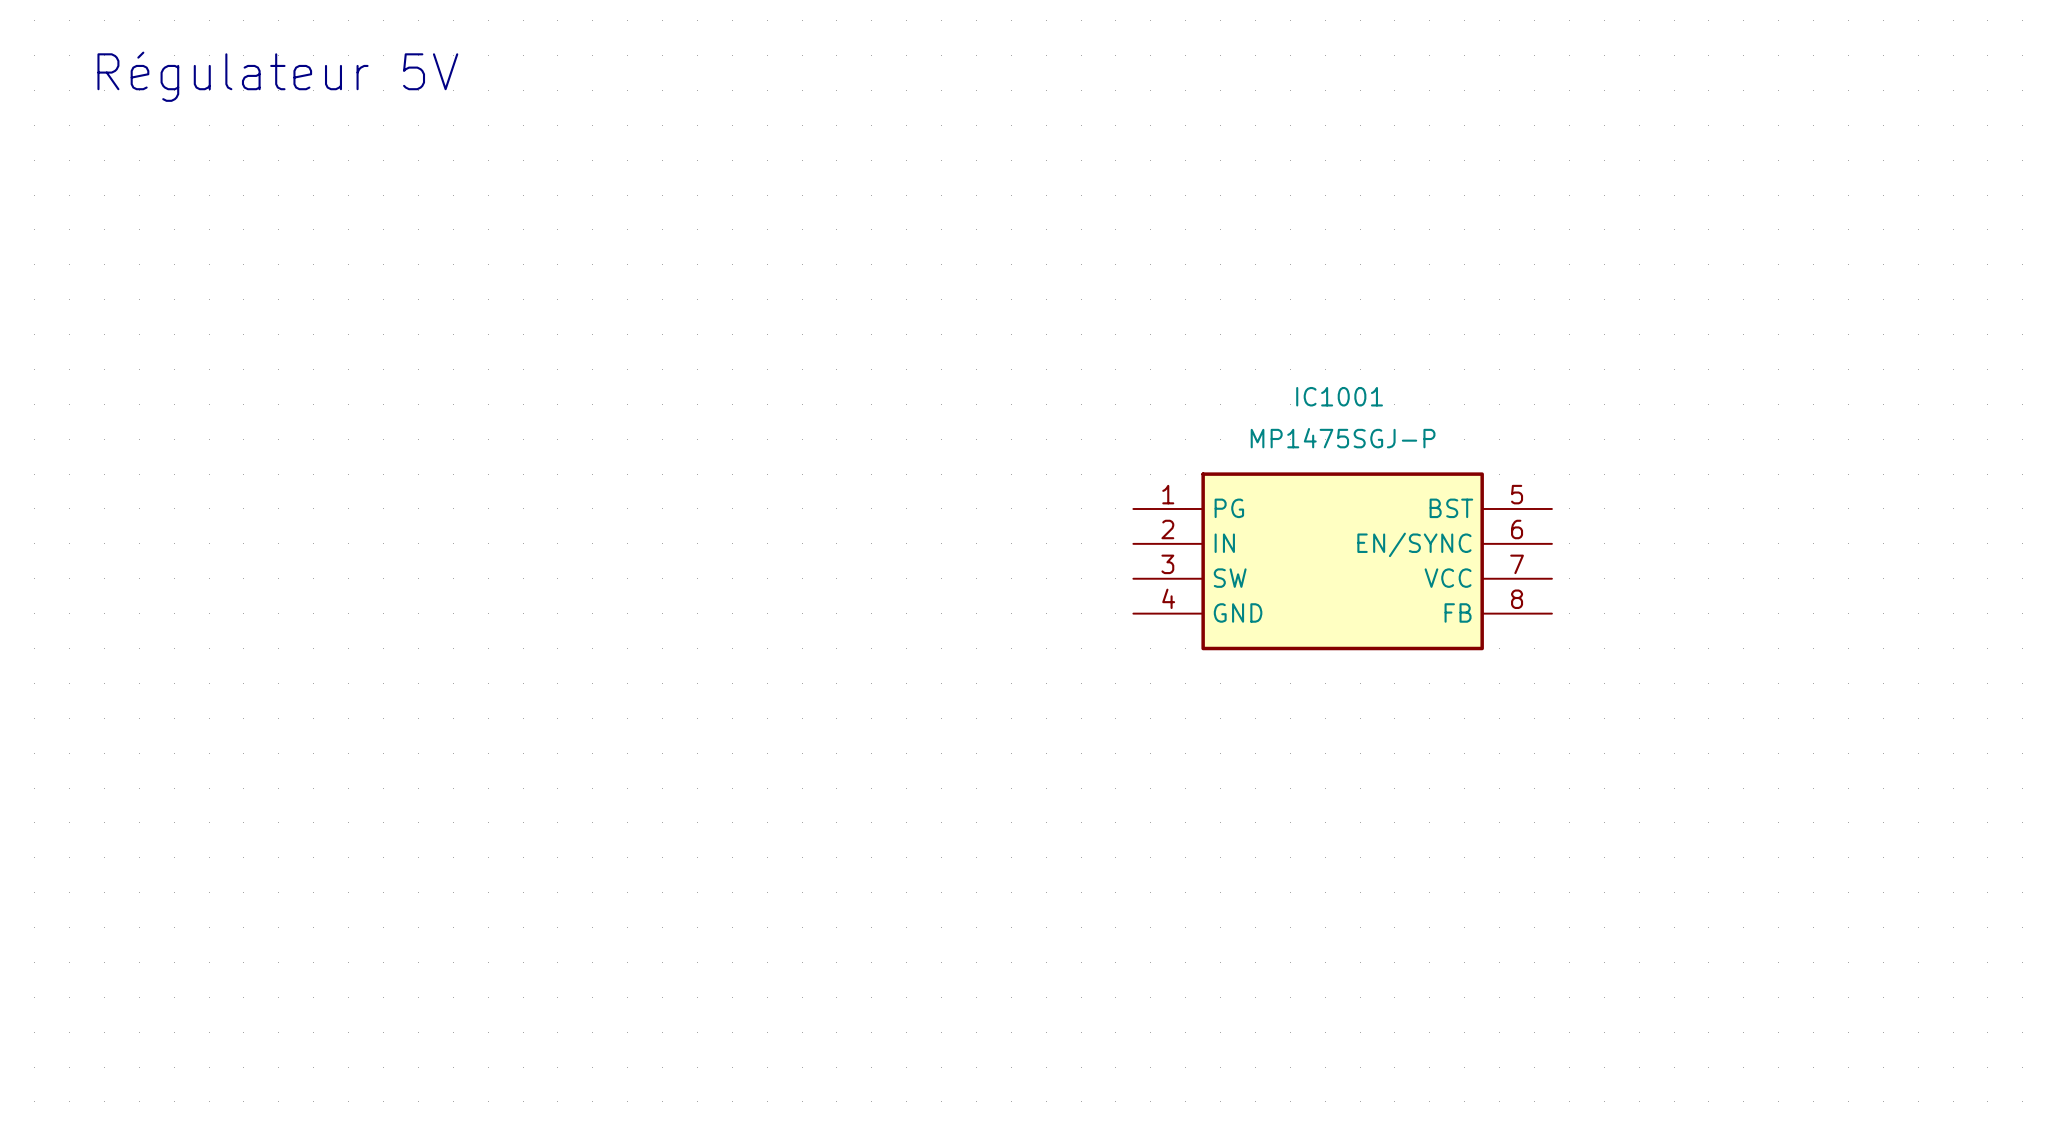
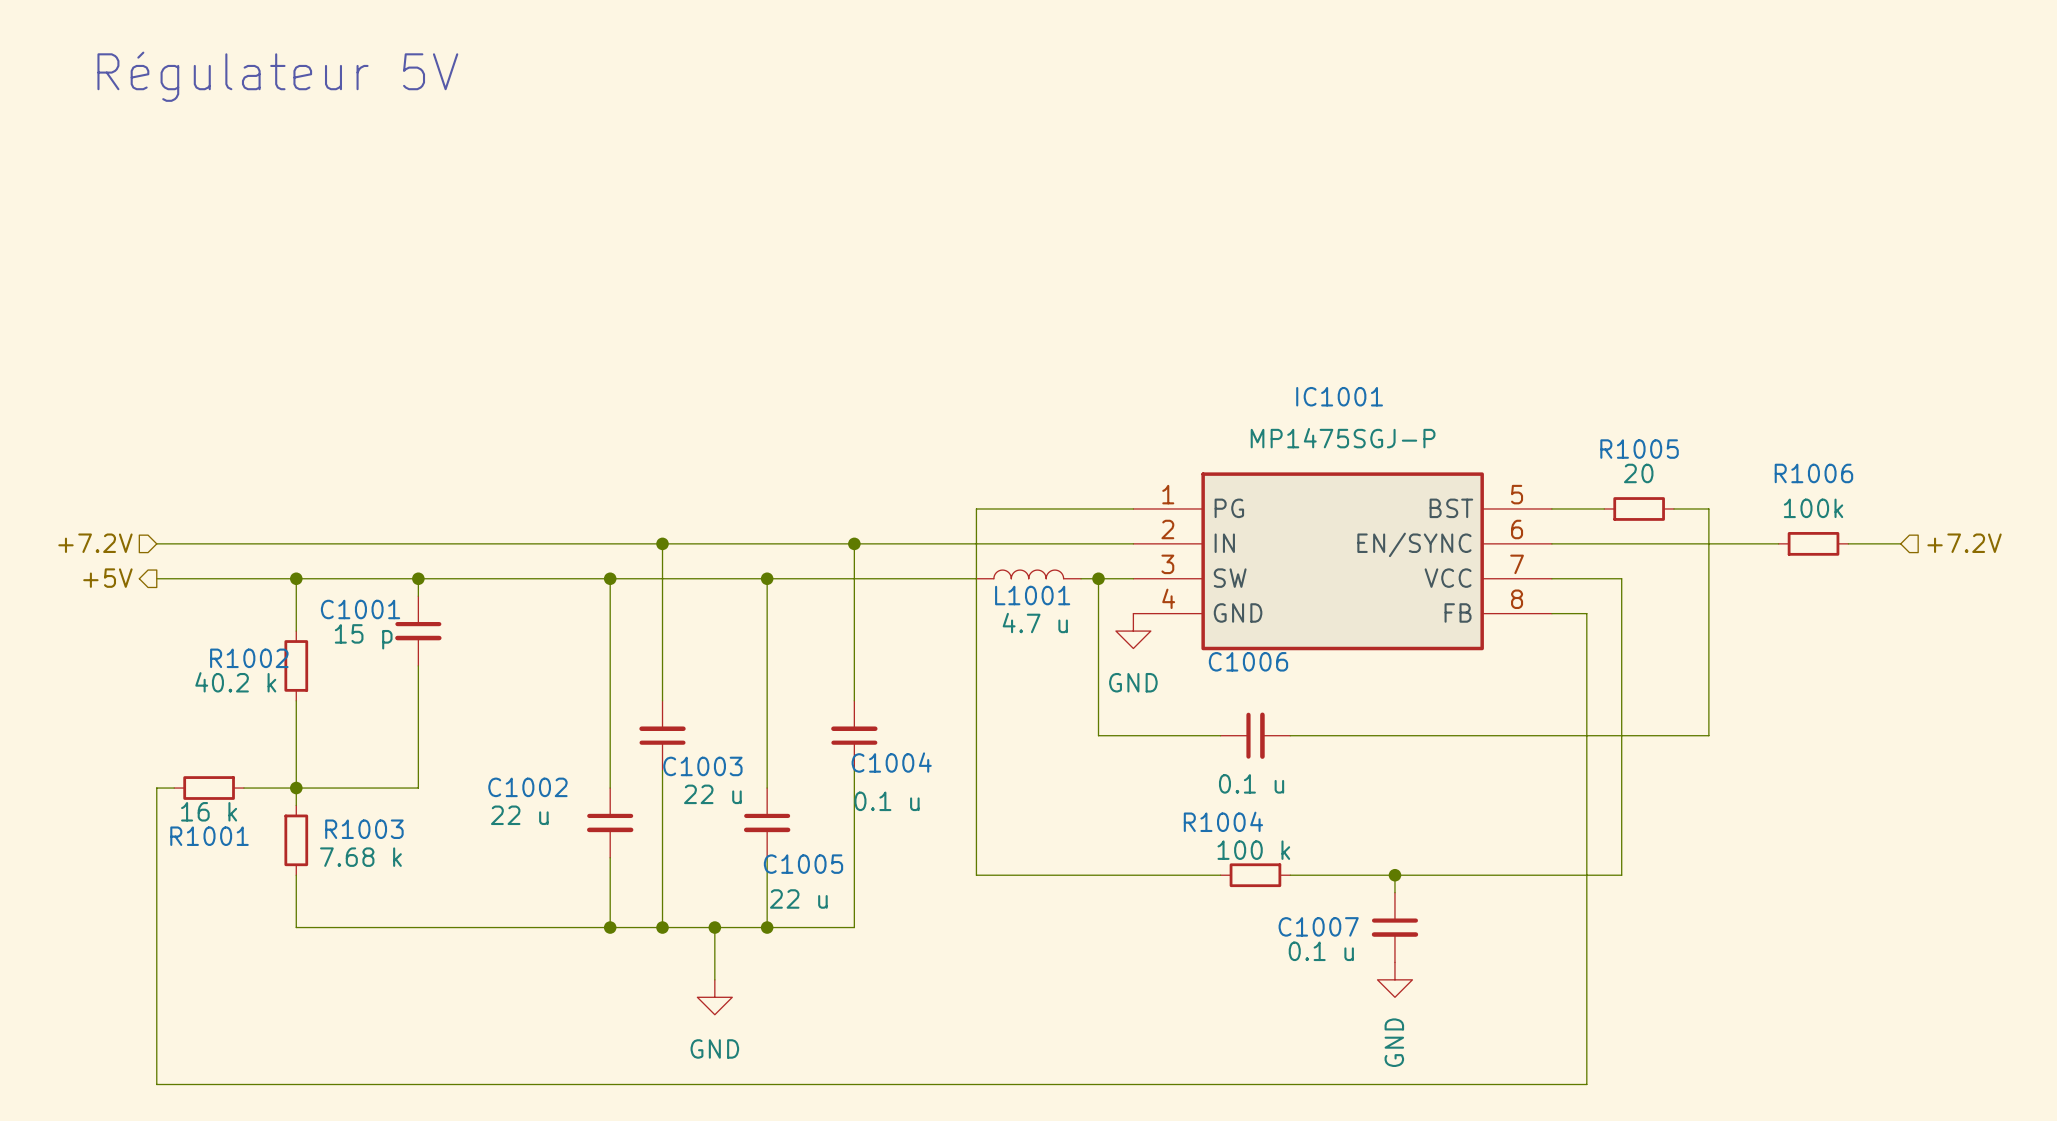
wire: none -> (1133, 508) (976, 508) (976, 875) (1220, 875)
wire: none -> (1551, 508) (1604, 508)
R1005: none -> 20 (1639, 508)
wire: none -> (1674, 508) (1708, 508) (1708, 735) (1290, 735)
hierarchical label: none -> +7.2V (95, 543)
wire: none -> (156, 543) (1133, 543)
wire: none -> (662, 543) (662, 700)
junction: none -> (662, 543)
wire: none -> (854, 543) (854, 700)
junction: none -> (854, 543)
wire: none -> (1551, 543) (1778, 543)
R1006: none -> 100k (1813, 543)
wire: none -> (1848, 543) (1900, 543)
hierarchical label: none -> +7.2V (1964, 543)
L1001: none -> 4.7 u (1028, 574)
hierarchical label: none -> +5V (107, 578)
wire: none -> (156, 578) (976, 578)
wire: none -> (296, 578) (296, 631)
junction: none -> (296, 578)
wire: none -> (418, 578) (418, 596)
junction: none -> (418, 578)
wire: none -> (610, 578) (610, 788)
junction: none -> (610, 578)
wire: none -> (767, 578) (767, 788)
junction: none -> (767, 578)
wire: none -> (1081, 578) (1133, 578)
wire: none -> (1098, 578) (1098, 735) (1220, 735)
junction: none -> (1098, 578)
wire: none -> (1551, 578) (1621, 578) (1621, 875) (1290, 875)
wire: none -> (1551, 613) (1586, 613) (1586, 1084) (156, 1084) (156, 788) (174, 788)
C1001: none -> 15 p (418, 631)
power symbol: none -> GND (1133, 631)
R1002: none -> 40.2 k (296, 665)
wire: none -> (418, 665) (418, 788) (243, 788)
wire: none -> (296, 700) (296, 805)
C1003: none -> 22 u (662, 735)
C1004: none -> 0.1 u (854, 735)
C1006: none -> 0.1 u (1255, 735)
wire: none -> (662, 770) (662, 927)
wire: none -> (854, 770) (854, 927) (296, 927) (296, 875)
R1001: none -> 16 k (209, 788)
junction: none -> (296, 788)
C1002: none -> 22 u (610, 822)
C1005: none -> 22 u (767, 822)
R1003: none -> 7.68 k (296, 840)
wire: none -> (610, 857) (610, 927)
wire: none -> (767, 857) (767, 927)
R1004: none -> 100 k (1255, 875)
wire: none -> (1394, 875) (1394, 892)
junction: none -> (1394, 875)
junction: none -> (610, 927)
junction: none -> (662, 927)
wire: none -> (714, 927) (714, 979)
junction: none -> (714, 927)
junction: none -> (767, 927)
C1007: none -> 0.1 u (1394, 927)
power symbol: none -> GND (1394, 979)
power symbol: none -> GND (714, 997)

